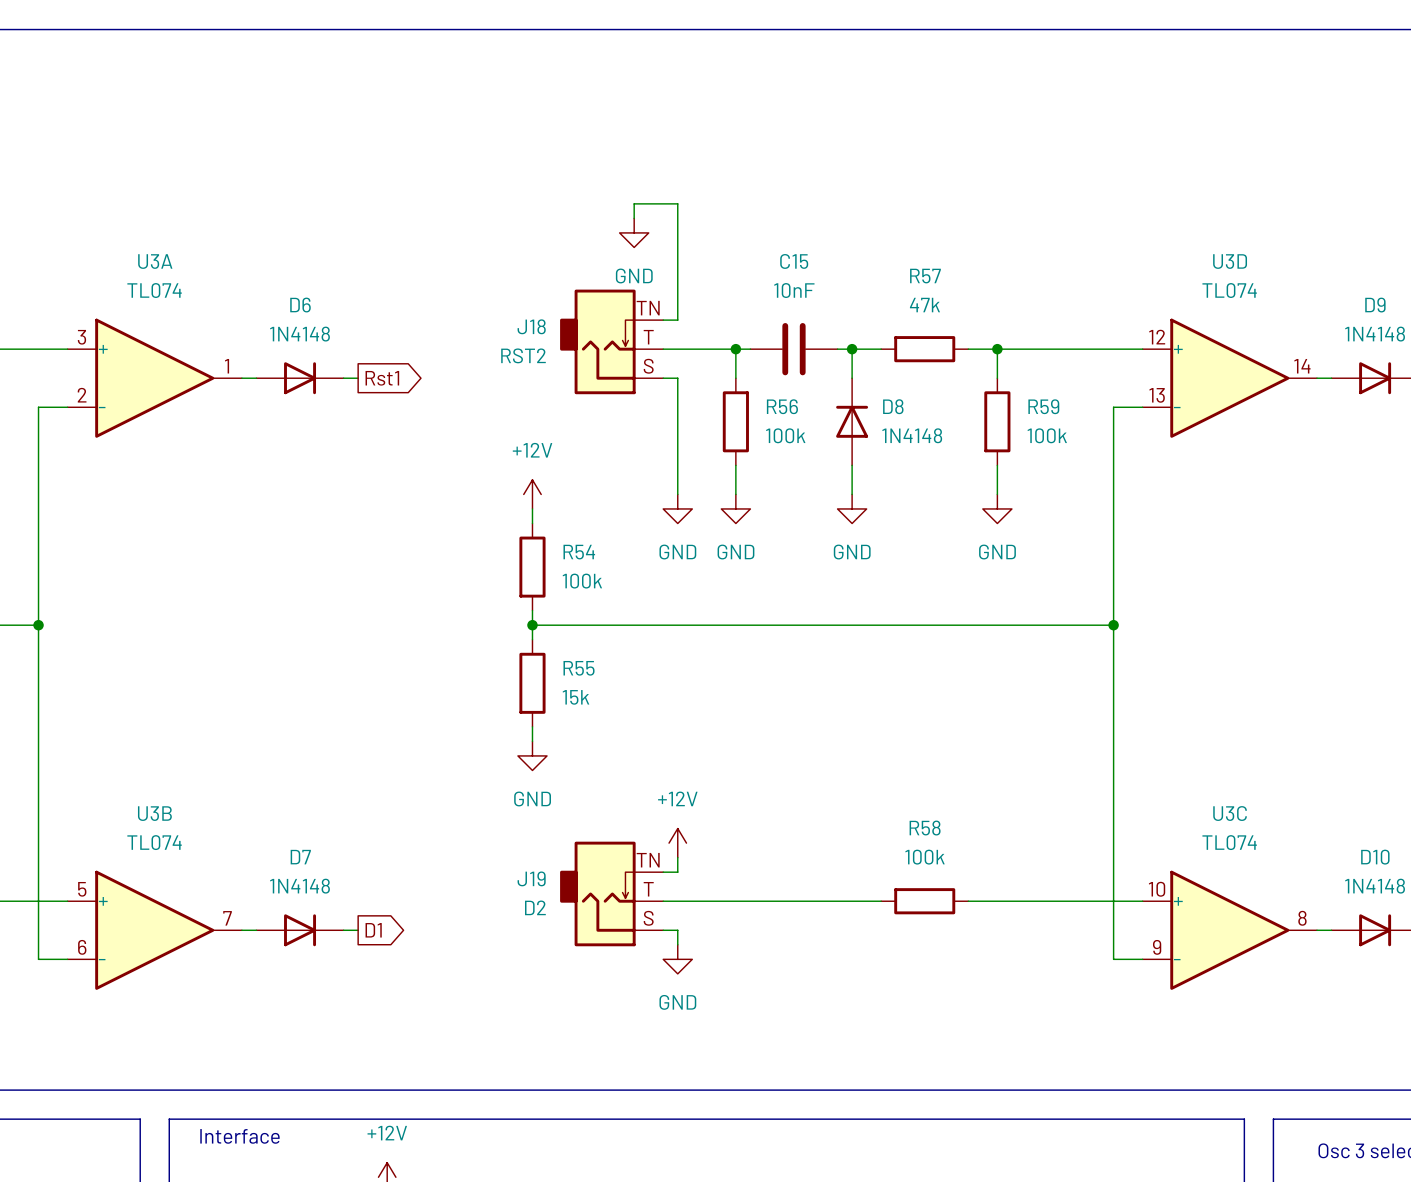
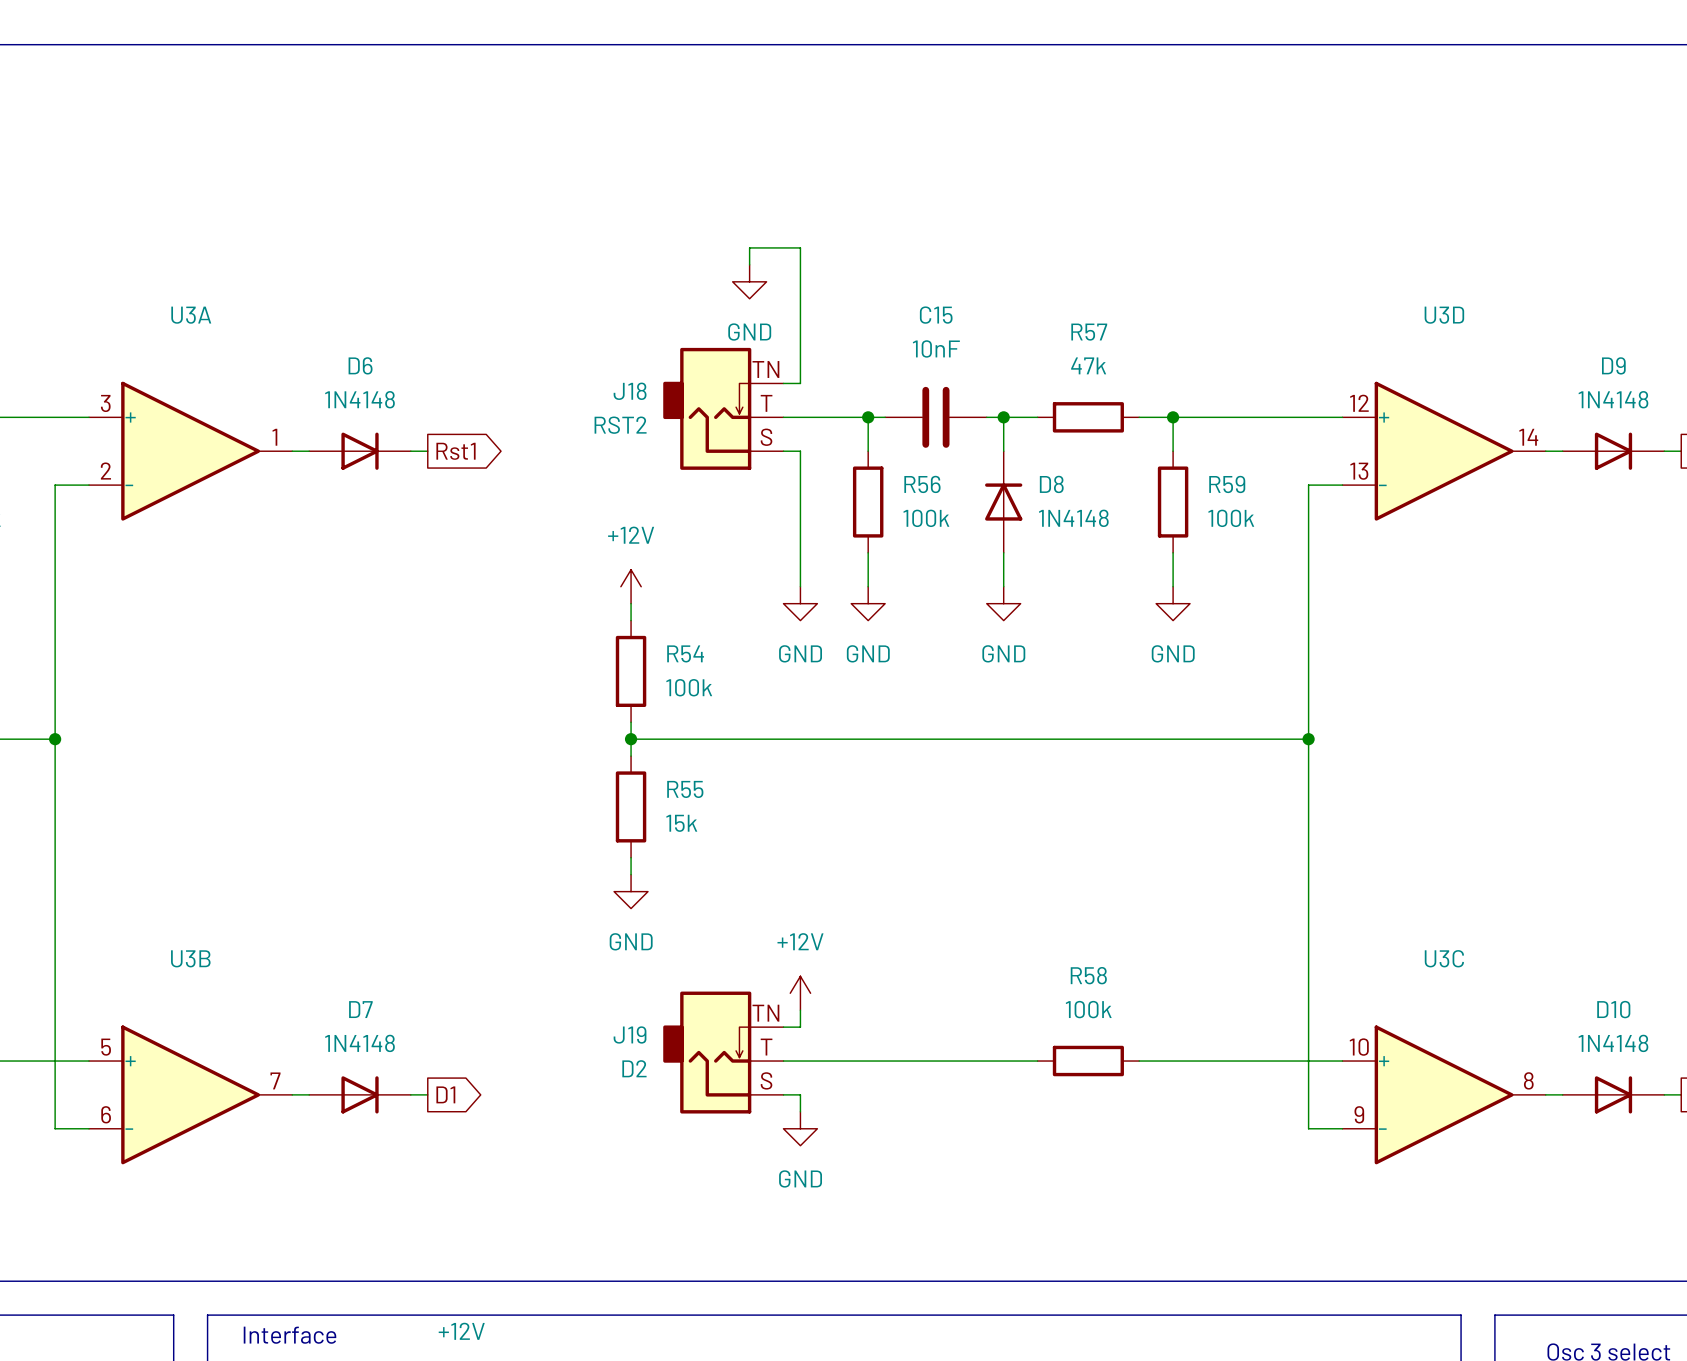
U3A value: TL074 (154, 290) -> none
U3D value: TL074 (1229, 290) -> none
U3B value: TL074 (154, 842) -> none
U3C value: TL074 (1229, 842) -> none

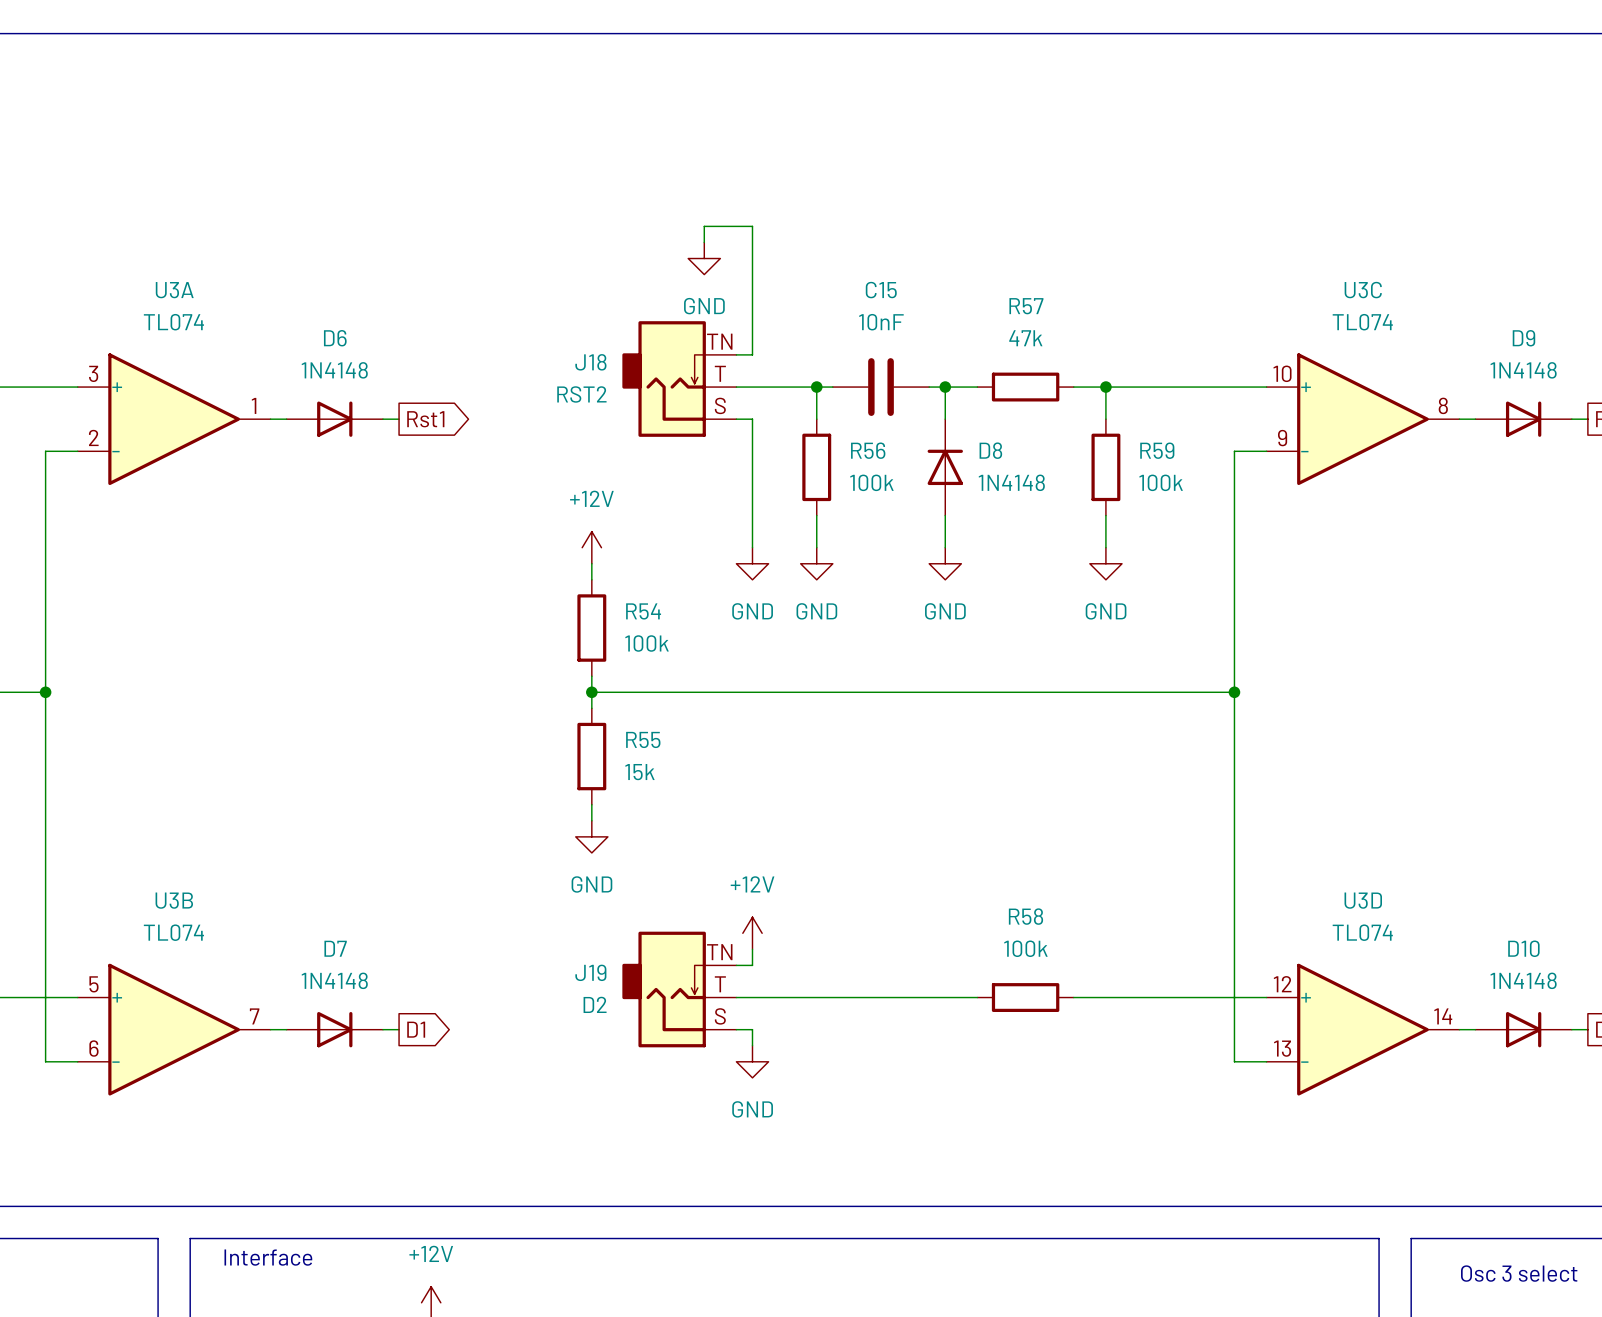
U3A value: none -> TL074 (173, 322)
U3C value: none -> TL074 (1362, 322)
U3D position: (1444, 451) -> (1362, 1029)
U3B value: none -> TL074 (173, 932)
U3D value: none -> TL074 (1362, 932)
U3C position: (1444, 1094) -> (1362, 419)

